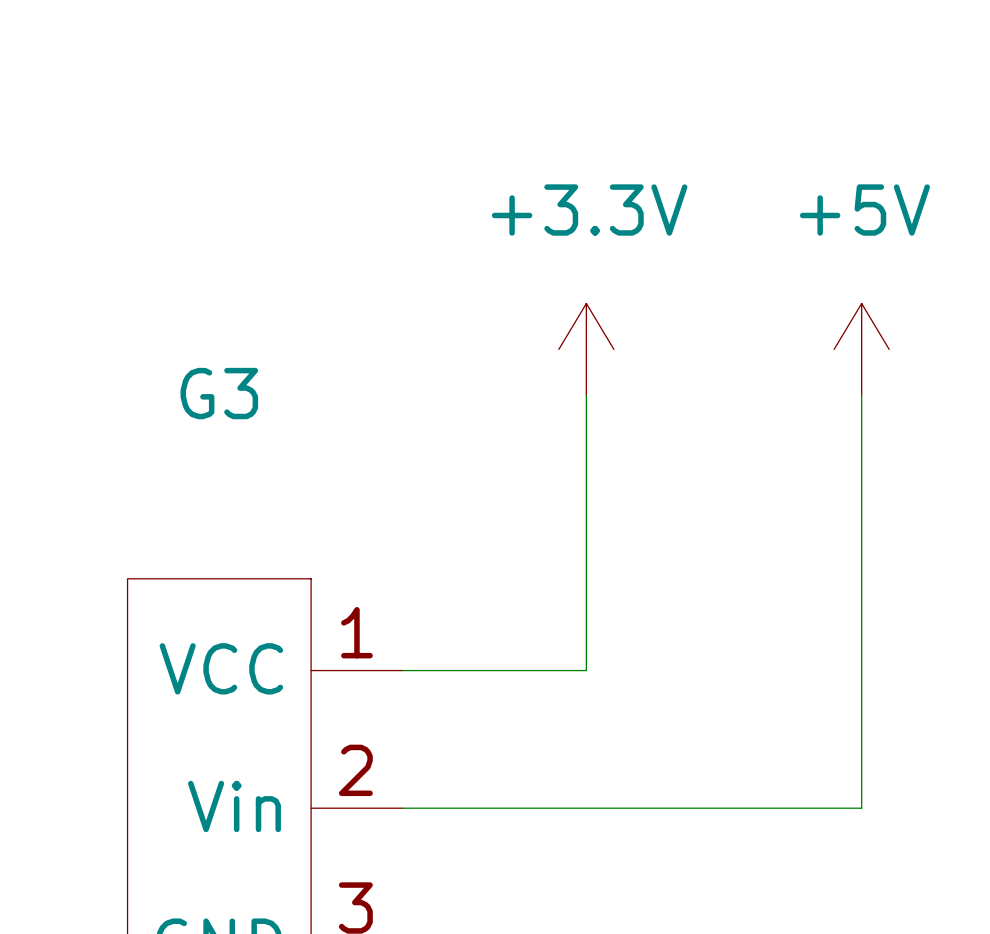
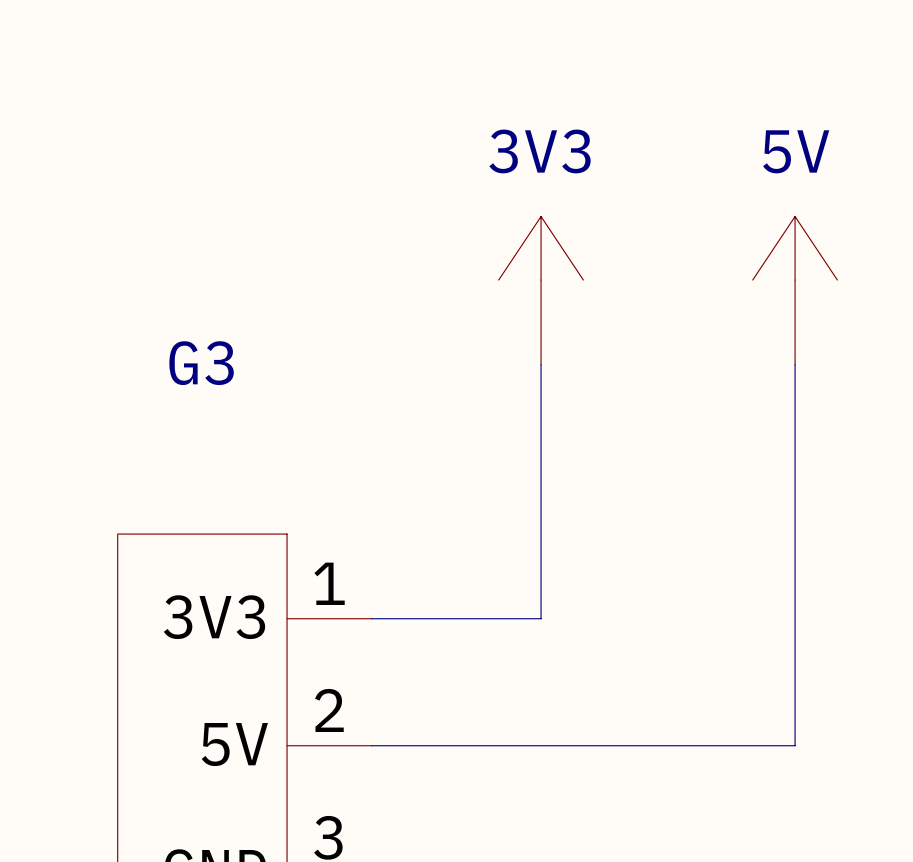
power symbol: +3.3V (586, 349) -> 3V3 (541, 290)
power symbol: +5V (861, 349) -> 5V (795, 290)
G3 pin name: VCC (221, 668) -> 3V3 (214, 617)
G3 pin name: Vin (234, 806) -> 5V (234, 744)

